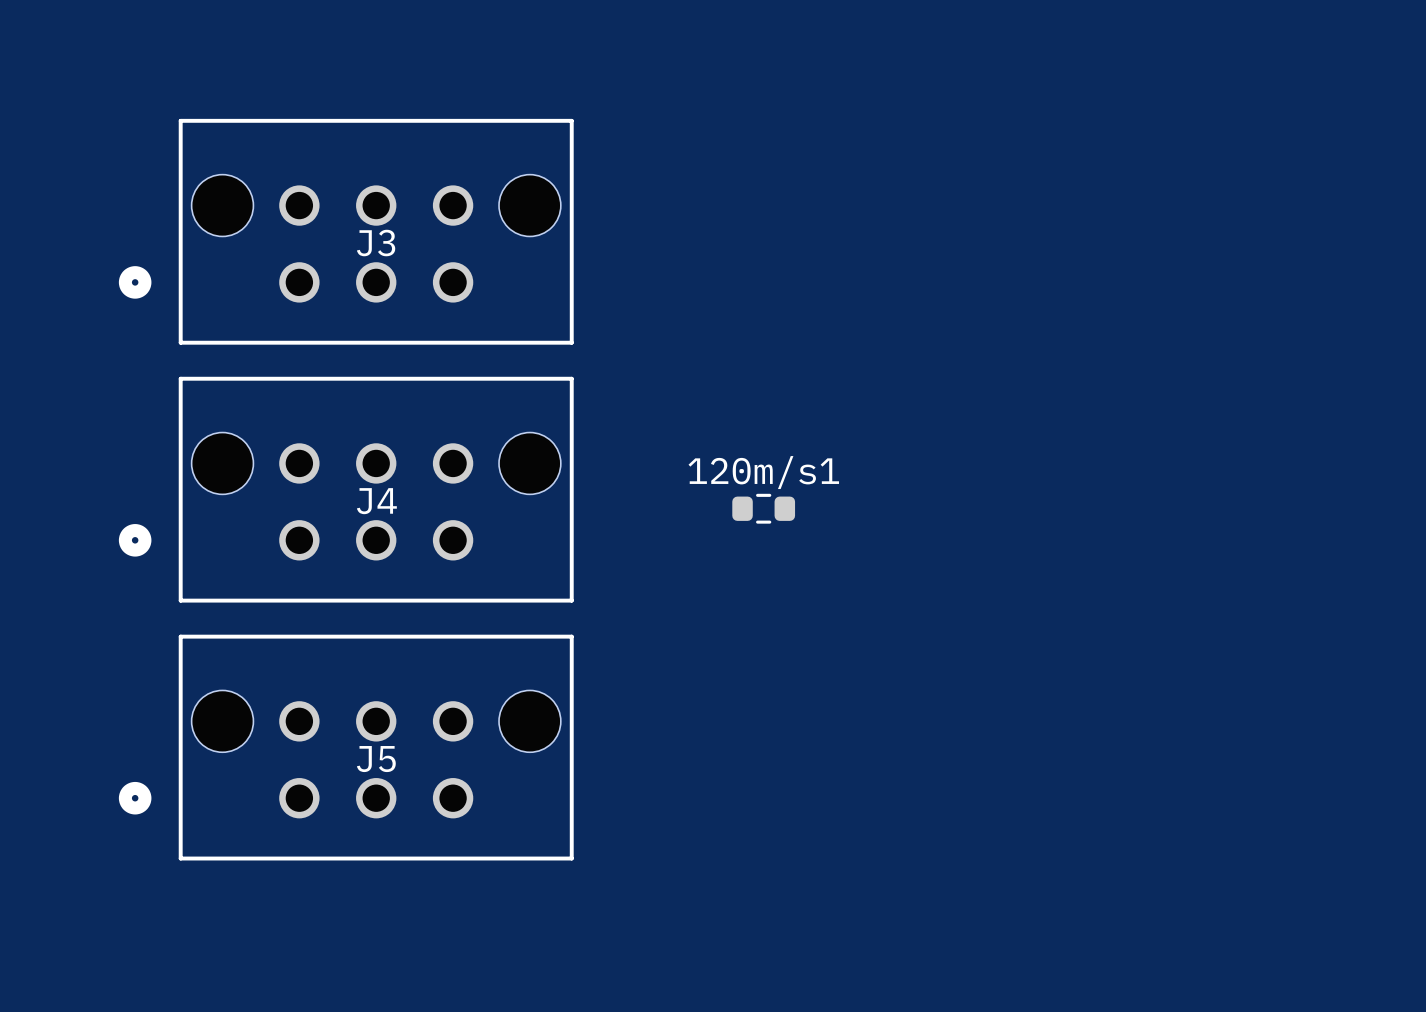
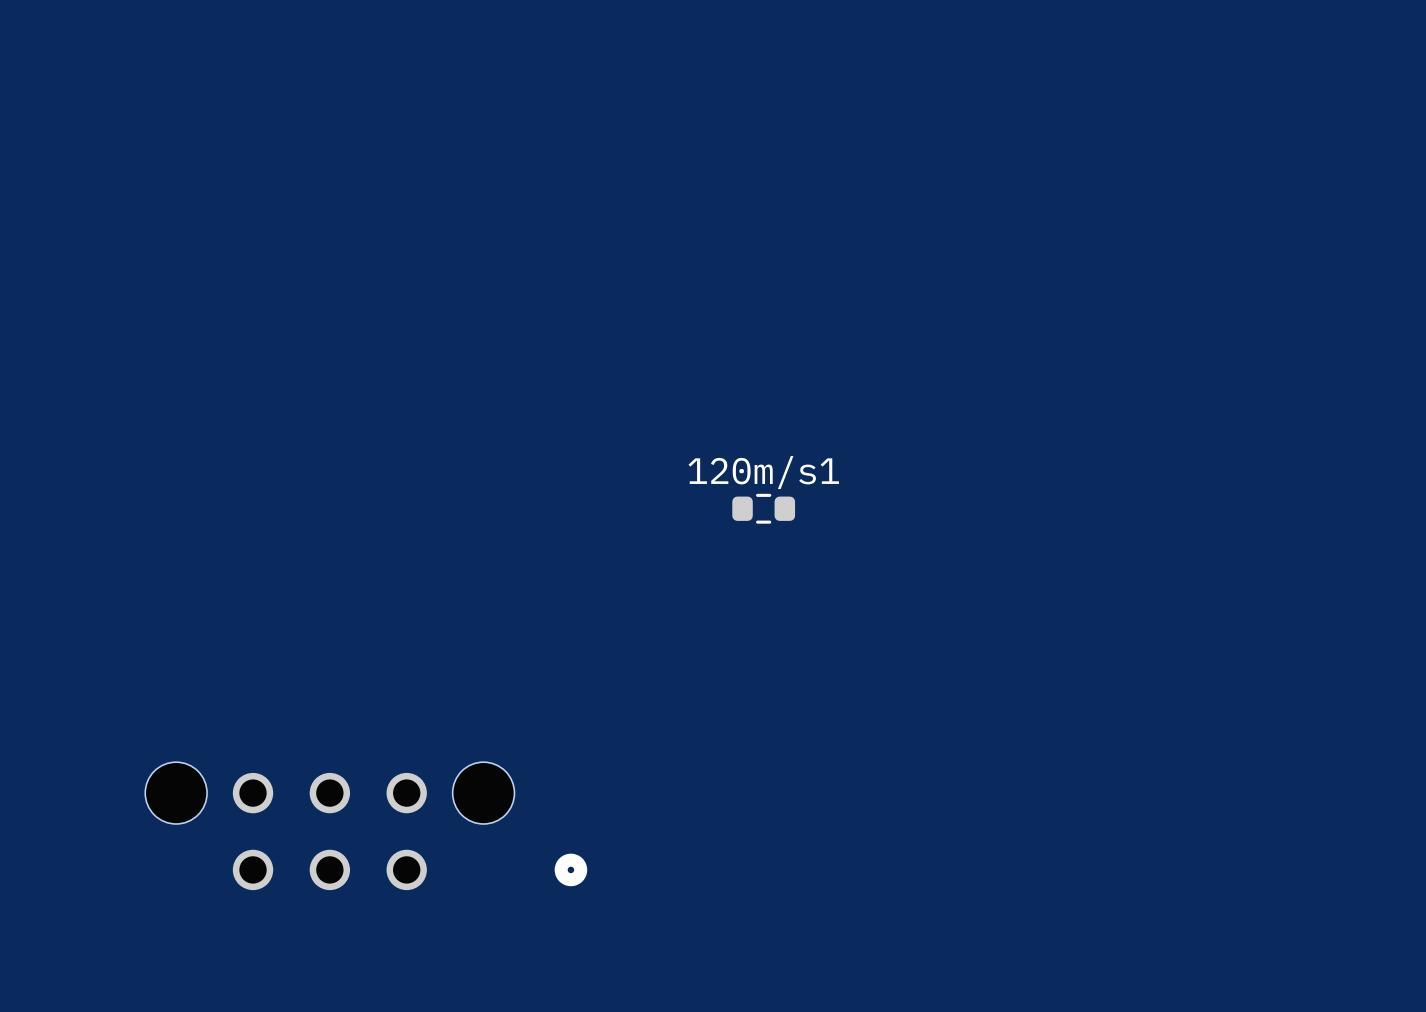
J3: (346, 231) -> none
J4 side: top (346, 489) -> bottom (366, 826)
J5: (346, 747) -> none

